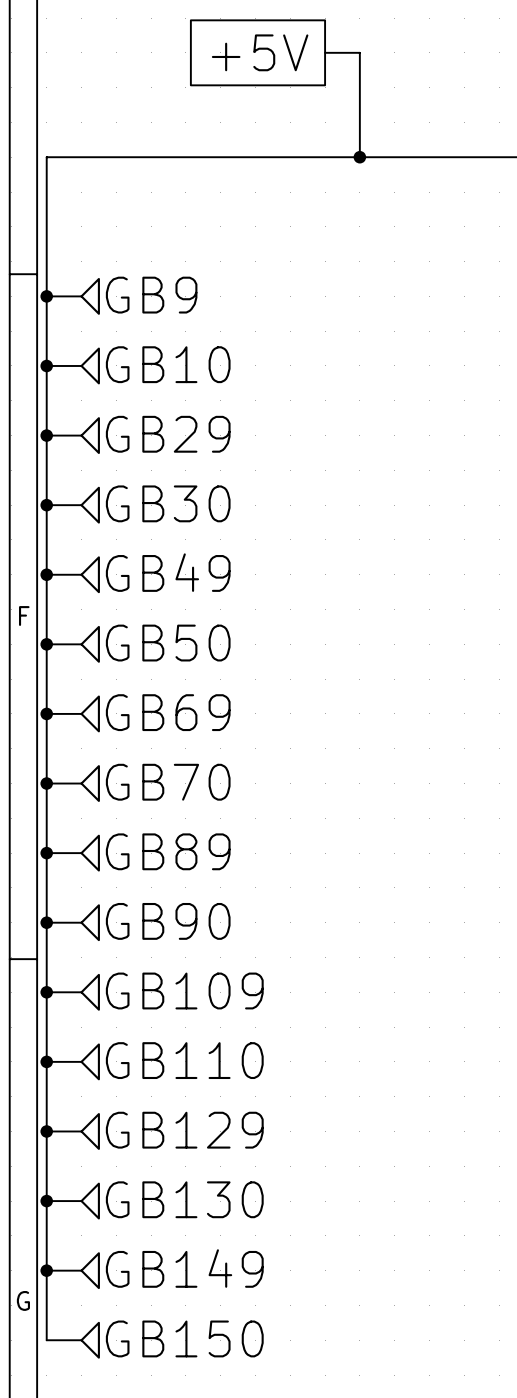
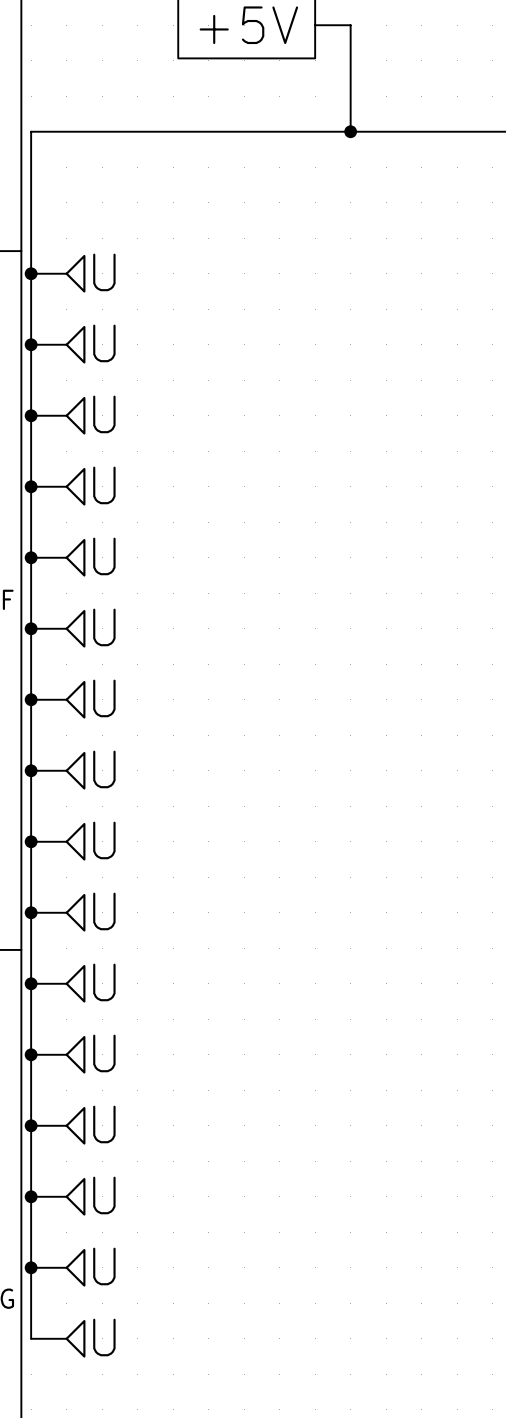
GB9 name: GB9 (151, 295) -> U (104, 272)
GB10 name: GB10 (168, 364) -> U (104, 343)
GB29 name: GB29 (168, 434) -> U (104, 414)
GB30 name: GB30 (168, 503) -> U (104, 485)
GB49 name: GB49 (168, 572) -> U (104, 556)
GB50 name: GB50 (168, 643) -> U (104, 627)
GB69 name: GB69 (168, 712) -> U (104, 698)
GB70 name: GB70 (168, 782) -> U (104, 769)
GB89 name: GB89 (168, 851) -> U (104, 840)
GB90 name: GB90 (168, 921) -> U (104, 911)
GB109 name: GB109 (184, 991) -> U (104, 982)
GB110 name: GB110 (184, 1060) -> U (104, 1053)
GB129 name: GB129 (184, 1130) -> U (104, 1124)
GB130 name: GB130 (184, 1199) -> U (104, 1195)
GB149 name: GB149 (184, 1268) -> U (104, 1266)
GB150 name: GB150 (184, 1338) -> U (104, 1337)

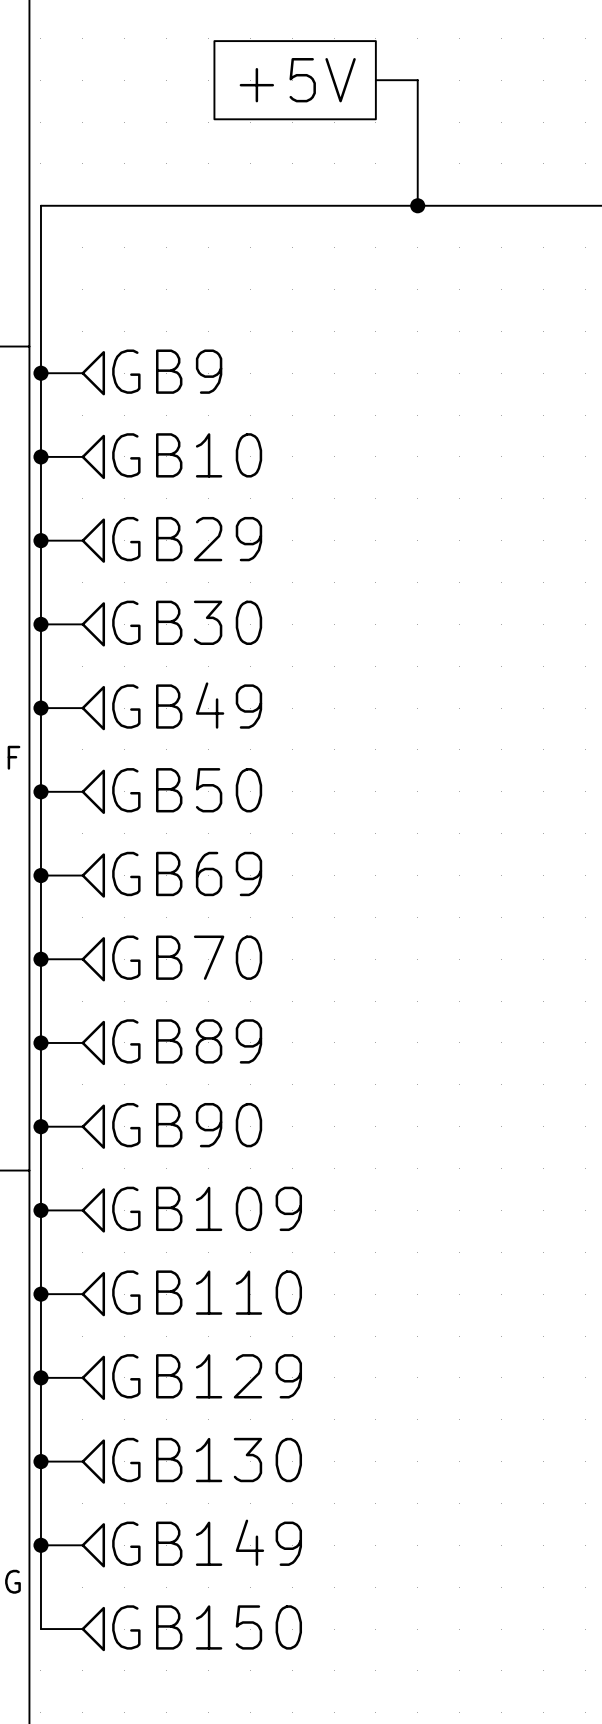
U name: U (104, 272) -> GB9 (167, 371)
U name: U (104, 343) -> GB10 (187, 455)
U name: U (104, 414) -> GB29 (187, 539)
U name: U (104, 485) -> GB30 (187, 622)
U name: U (104, 556) -> GB49 (187, 705)
U name: U (104, 627) -> GB50 (187, 790)
U name: U (104, 698) -> GB69 (187, 873)
U name: U (104, 769) -> GB70 (187, 957)
U name: U (104, 840) -> GB89 (187, 1041)
U name: U (104, 911) -> GB90 (187, 1125)
U name: U (104, 982) -> GB109 (207, 1208)
U name: U (104, 1053) -> GB110 (207, 1292)
U name: U (104, 1124) -> GB129 (207, 1376)
U name: U (104, 1195) -> GB130 (207, 1460)
U name: U (104, 1266) -> GB149 (207, 1542)
U name: U (104, 1337) -> GB150 (207, 1627)

